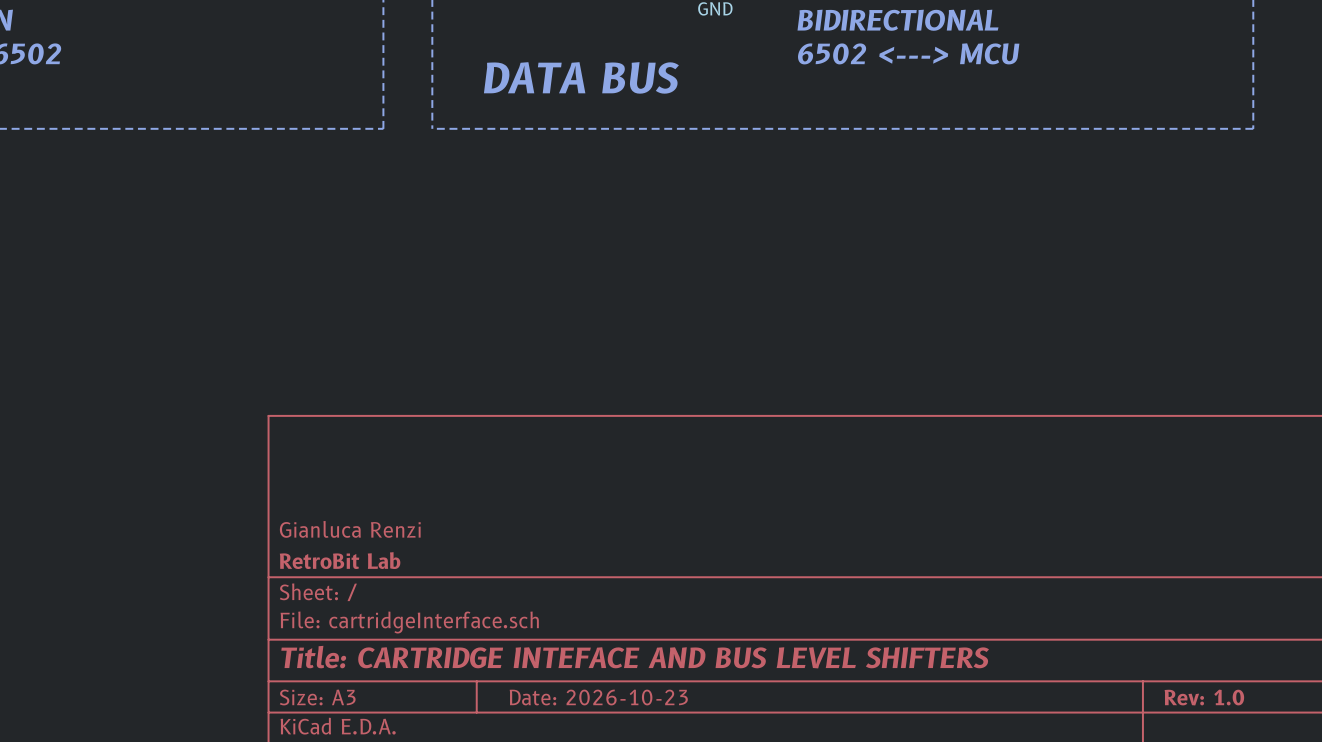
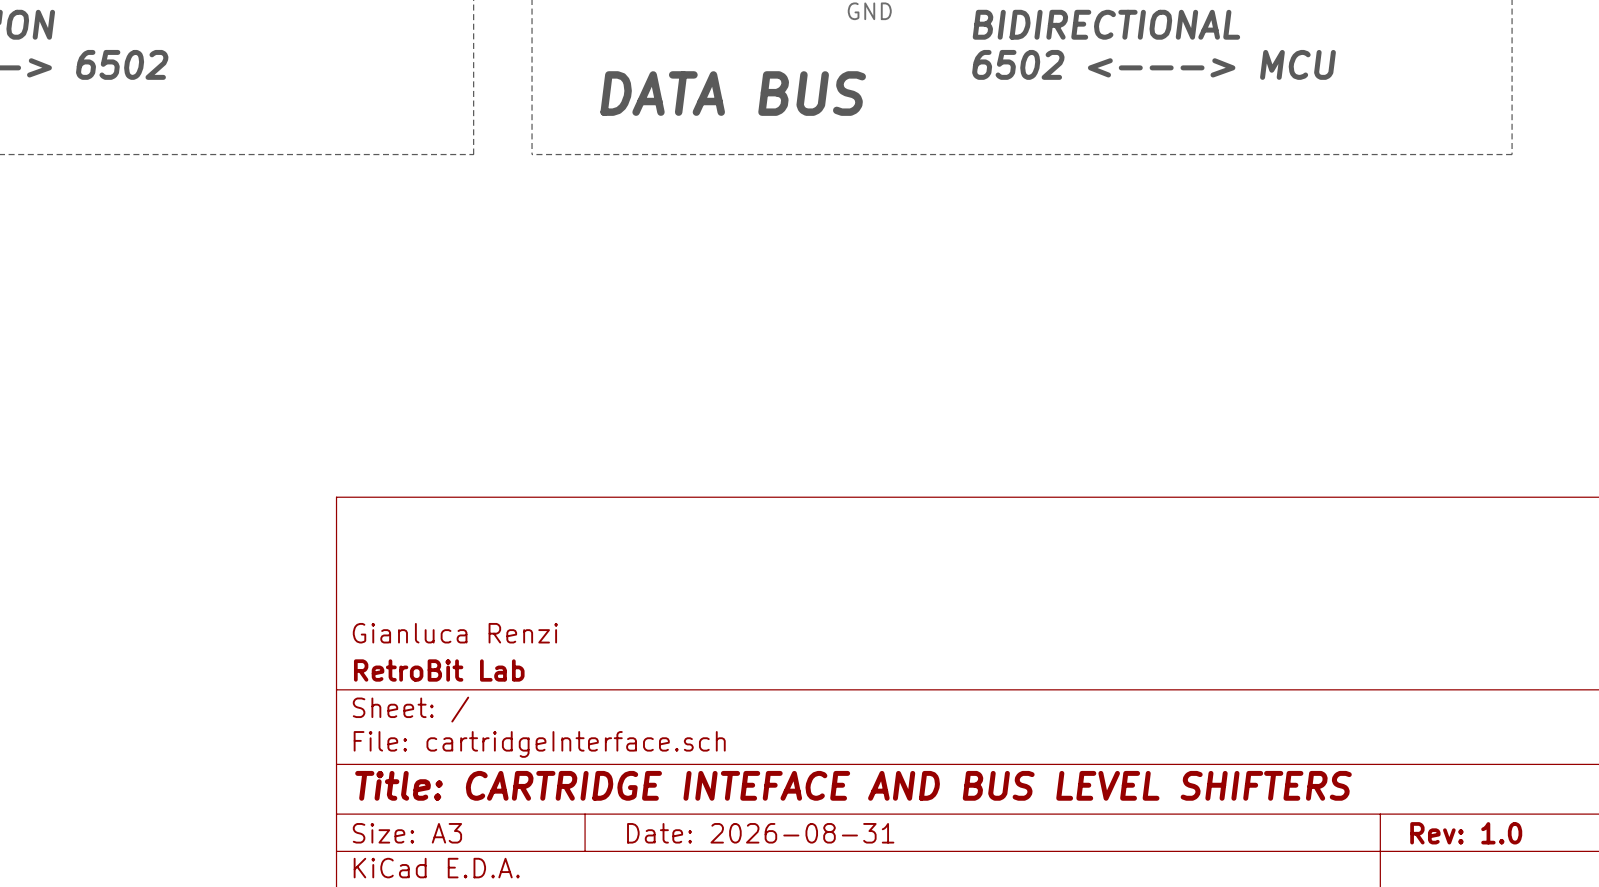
title block: Date: 2026-10-23 (598, 697) -> Date: 2026-08-31 (760, 833)

